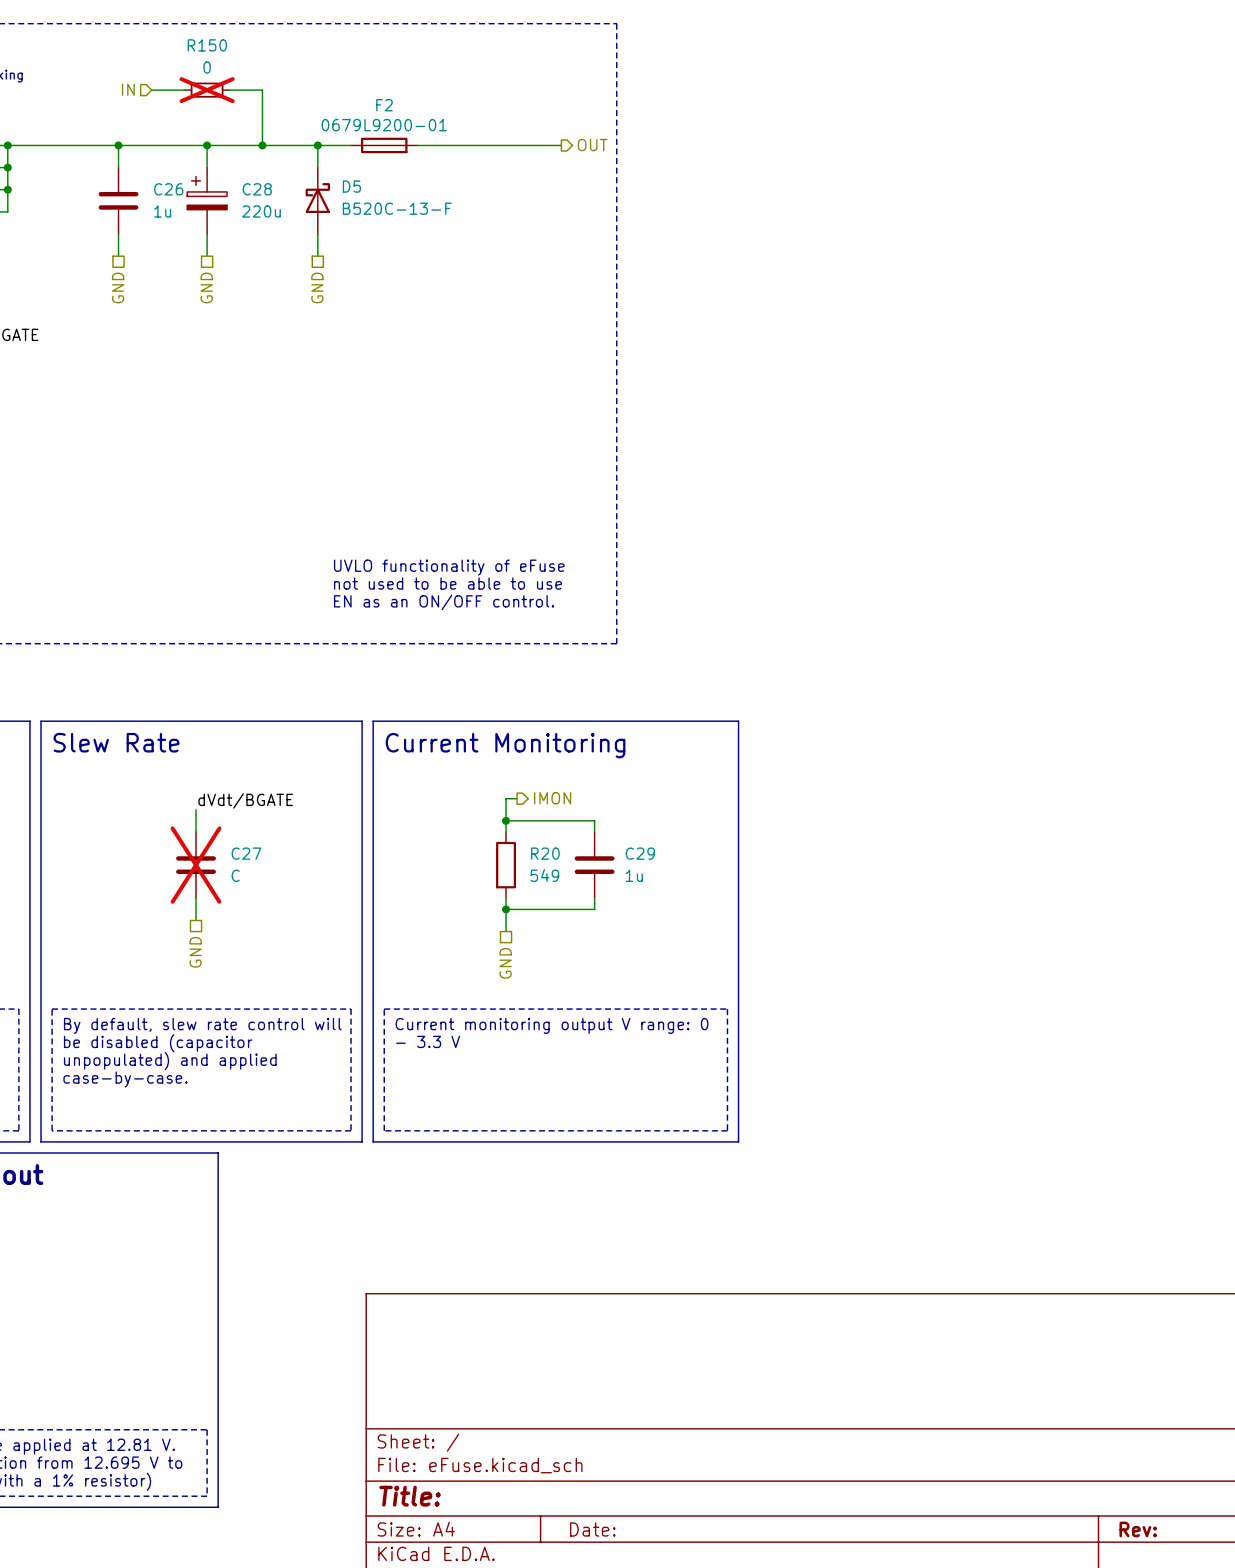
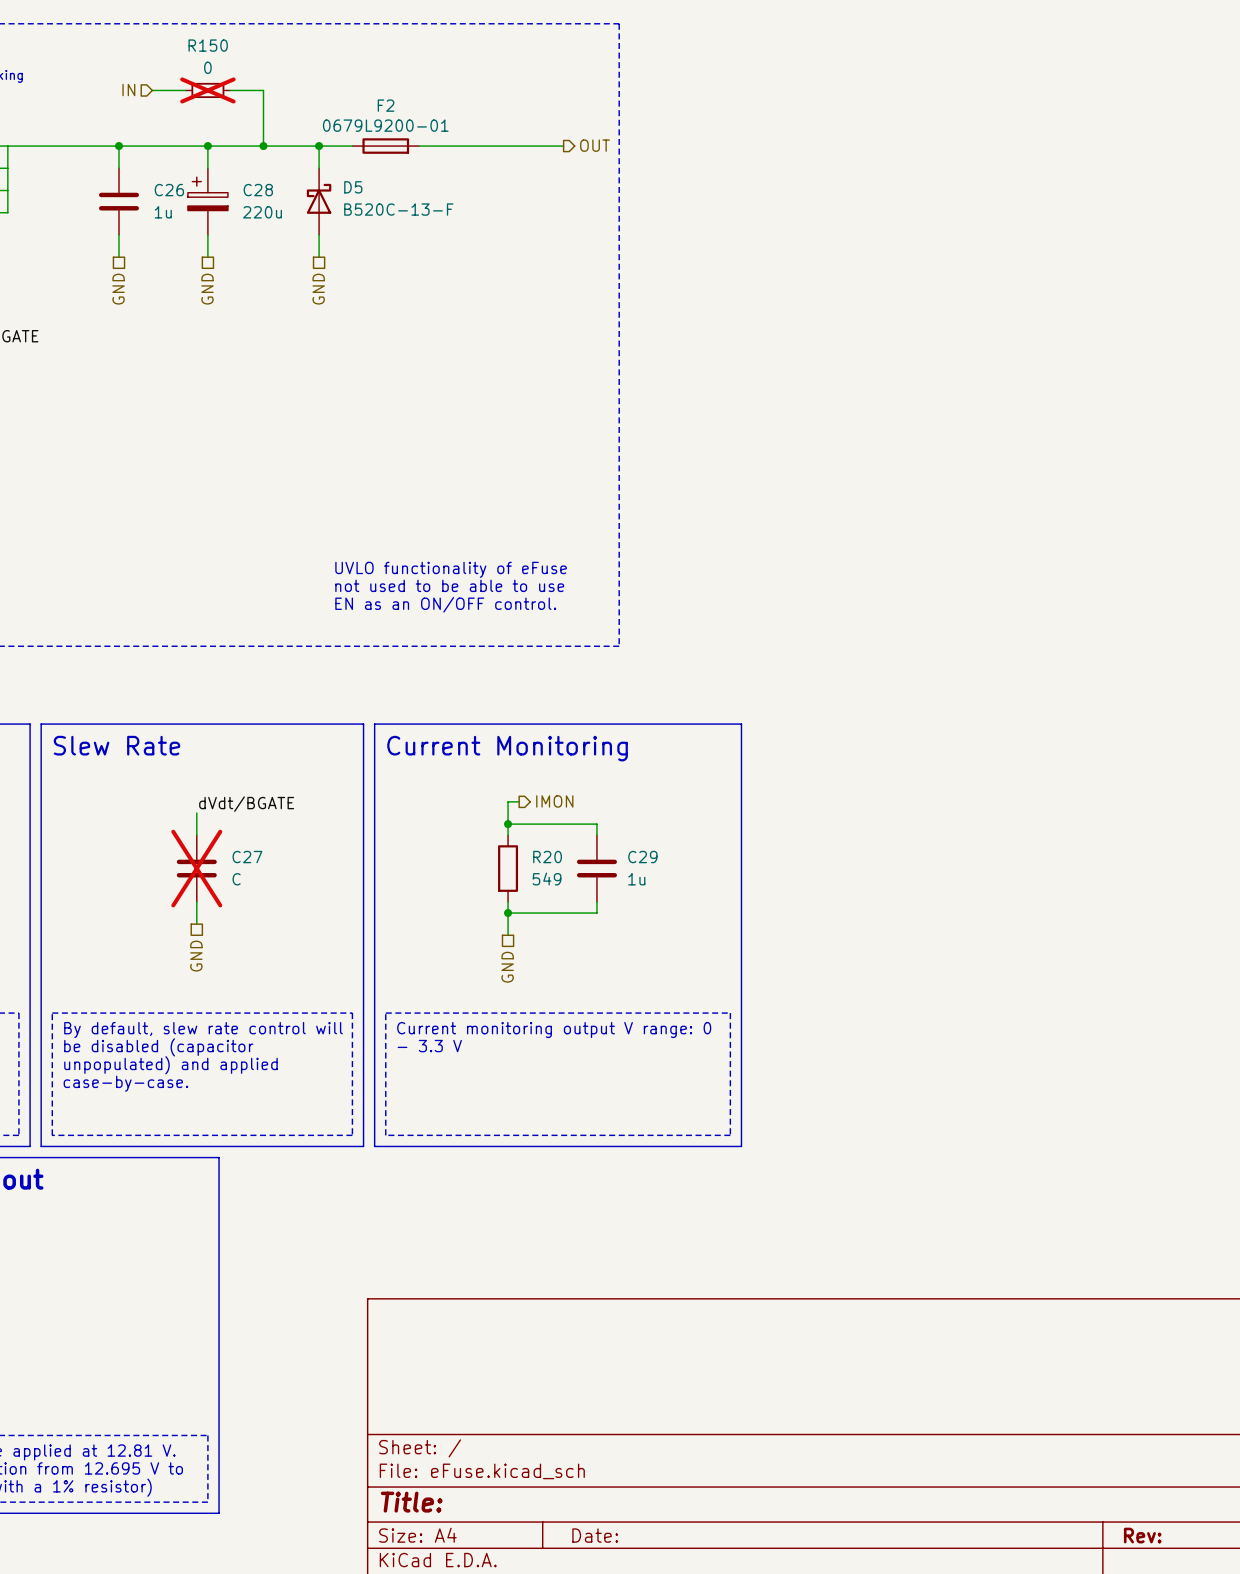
junction: (7, 145) -> none
junction: (7, 167) -> none
junction: (7, 189) -> none

